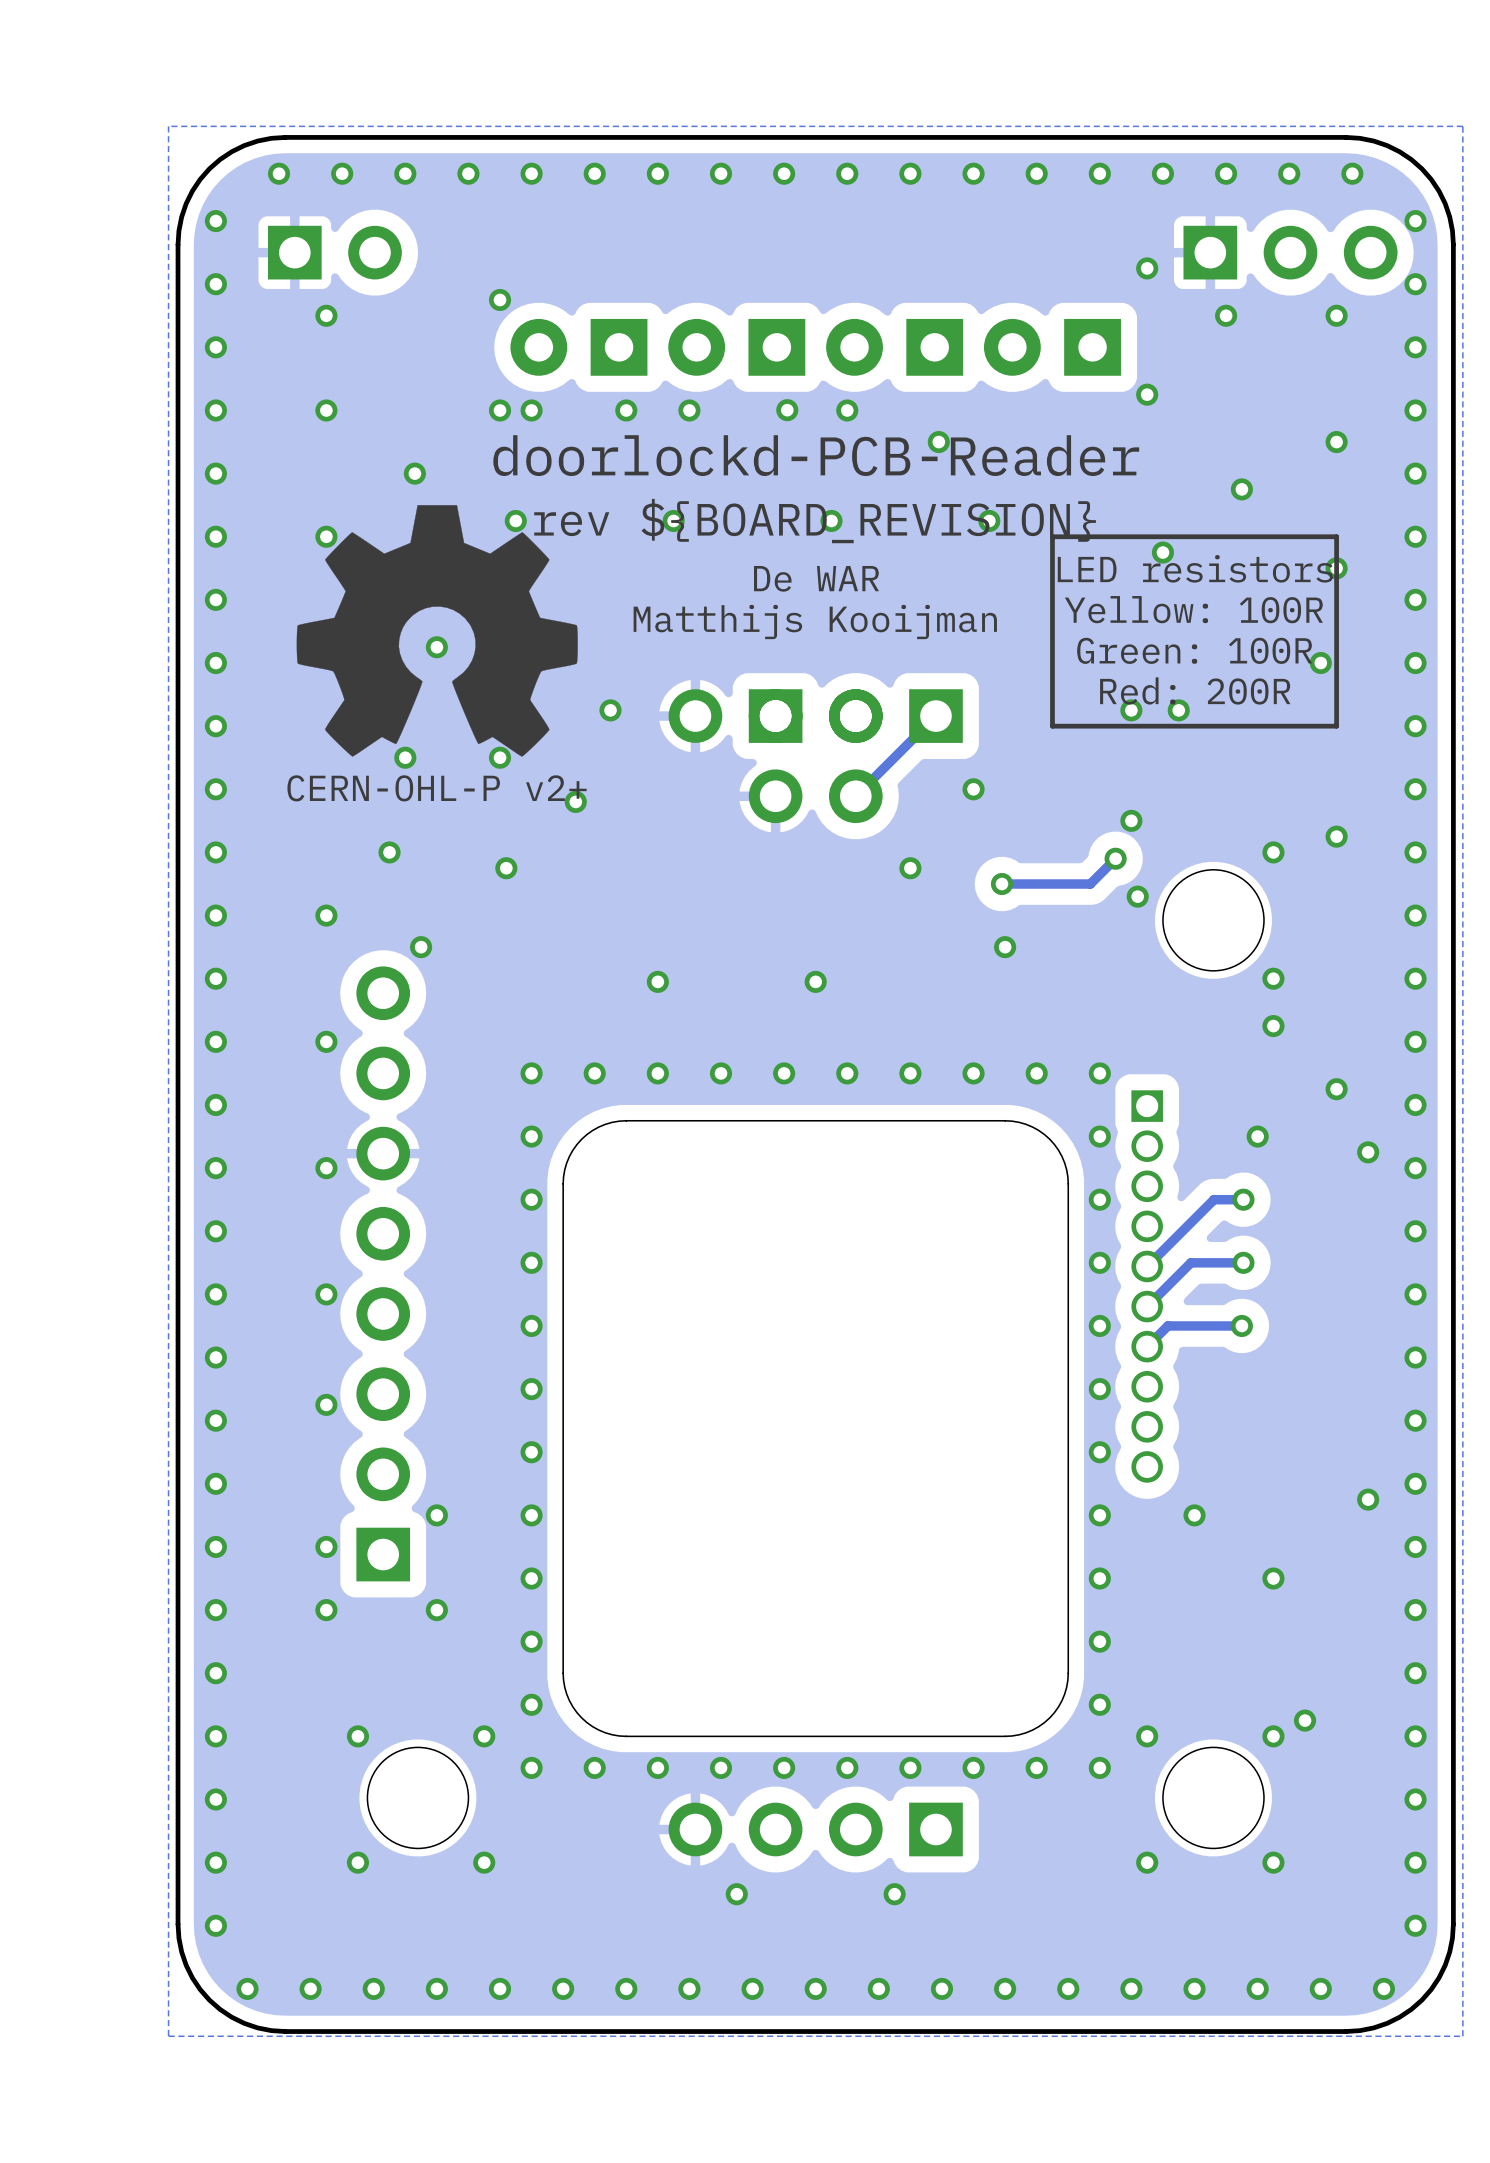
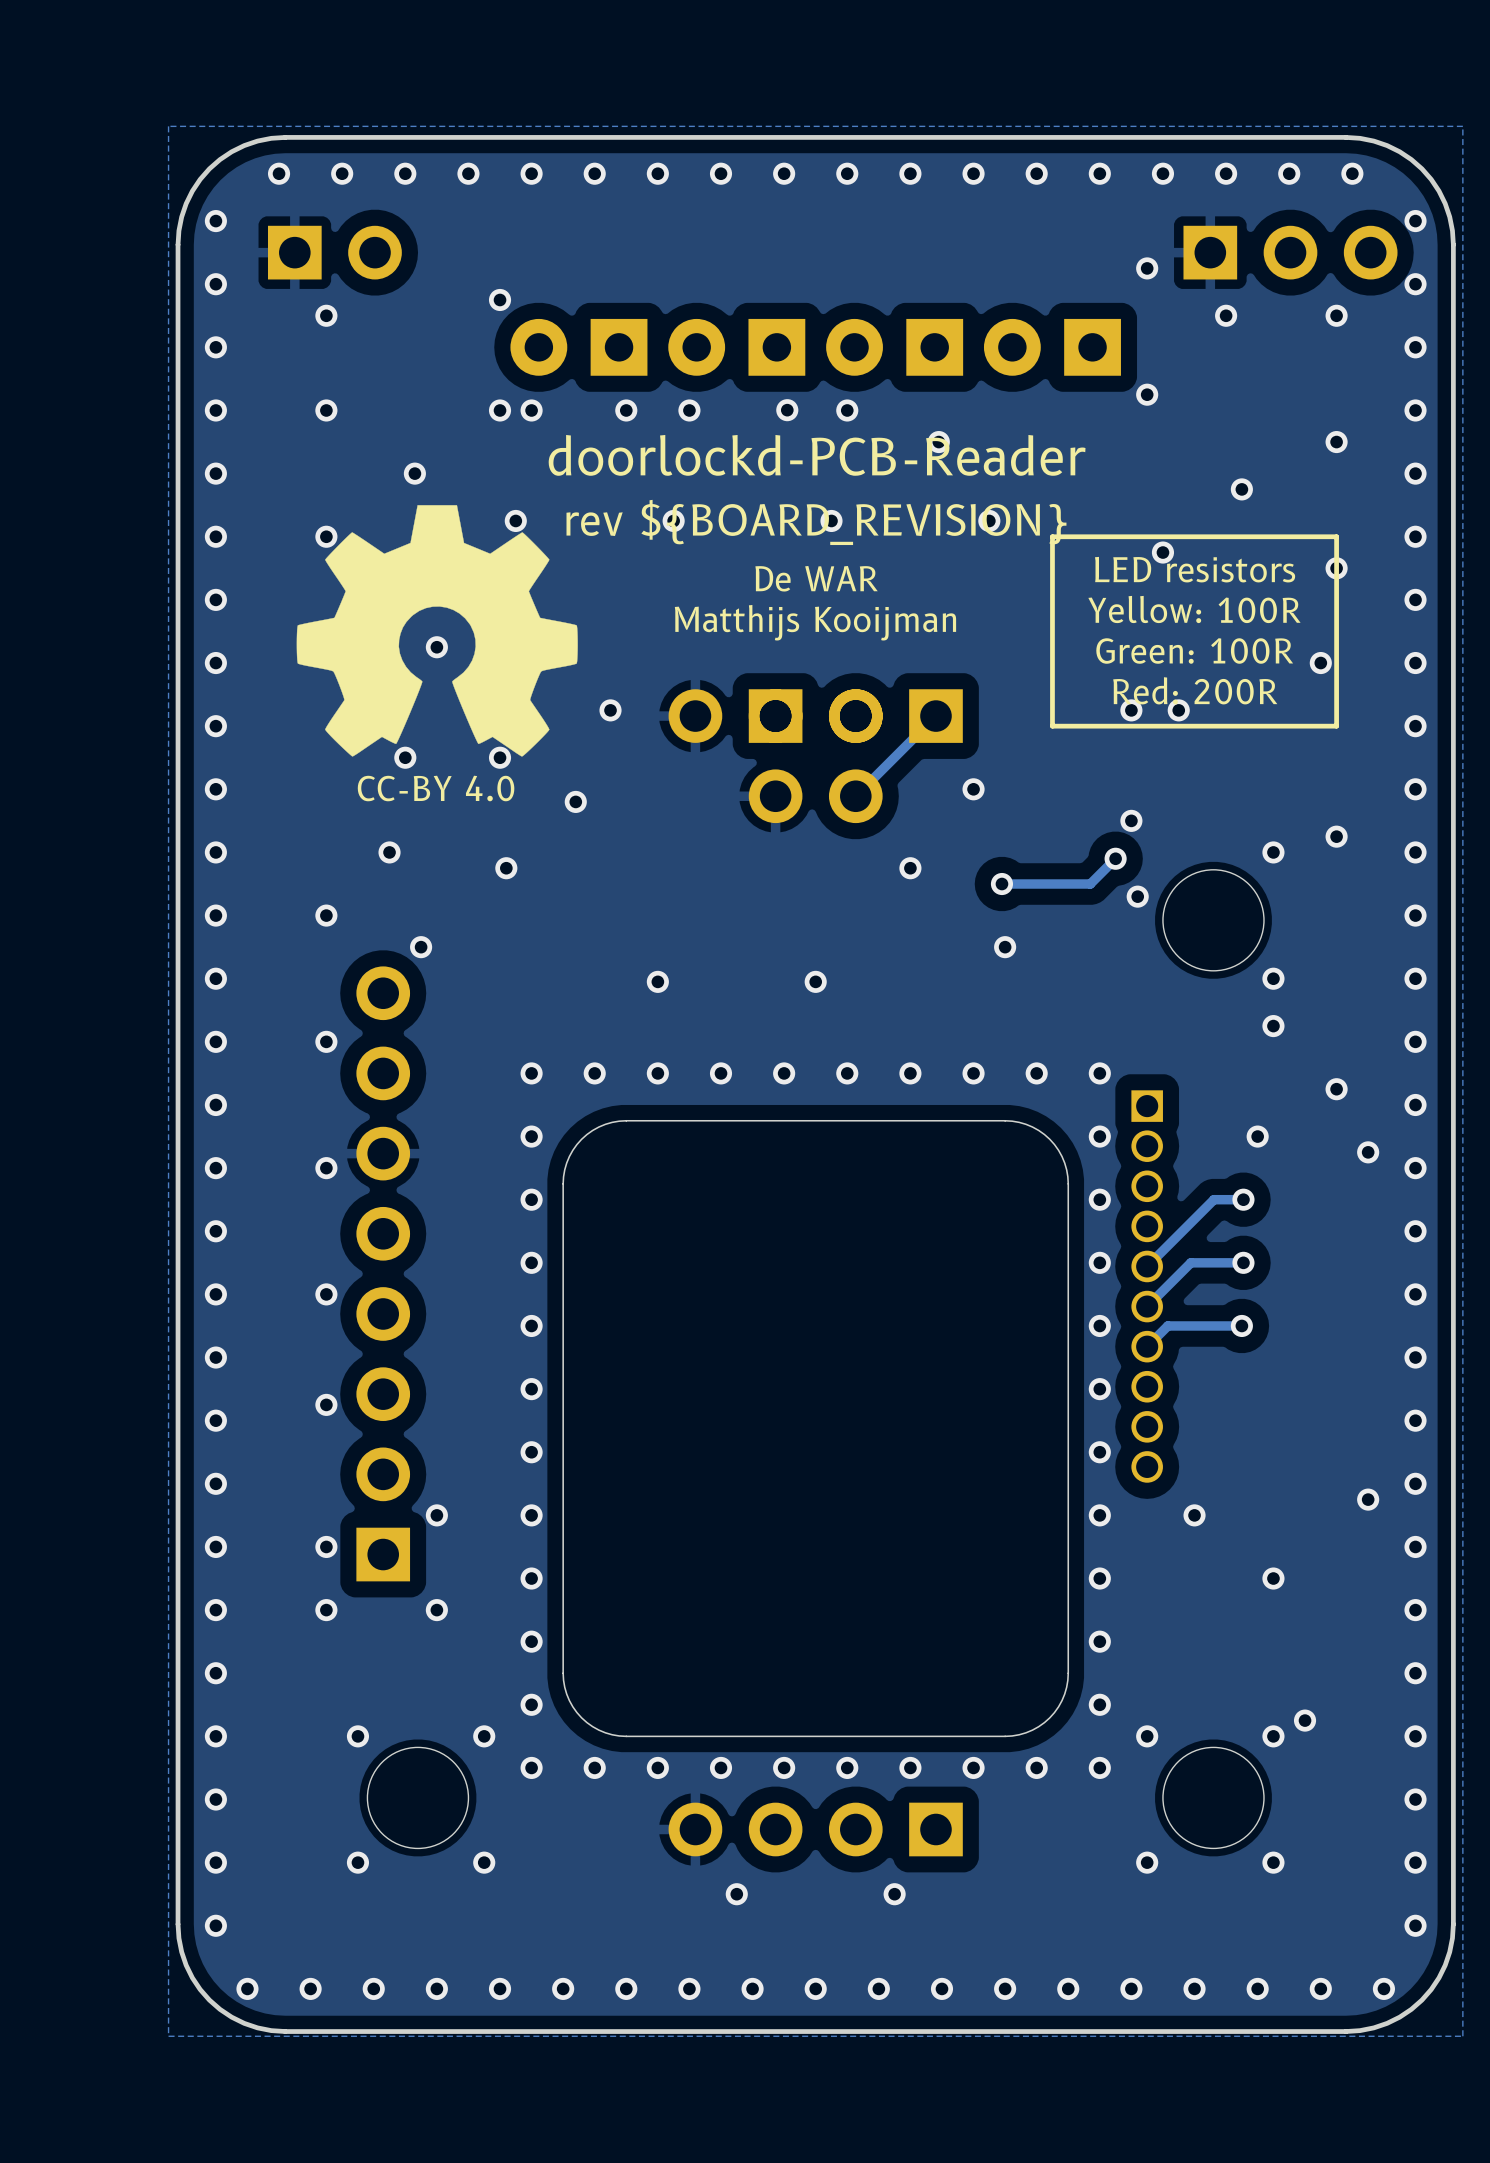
text: CERN-OHL-P v2+ (437, 788) -> CC-BY 4.0 (436, 788)

